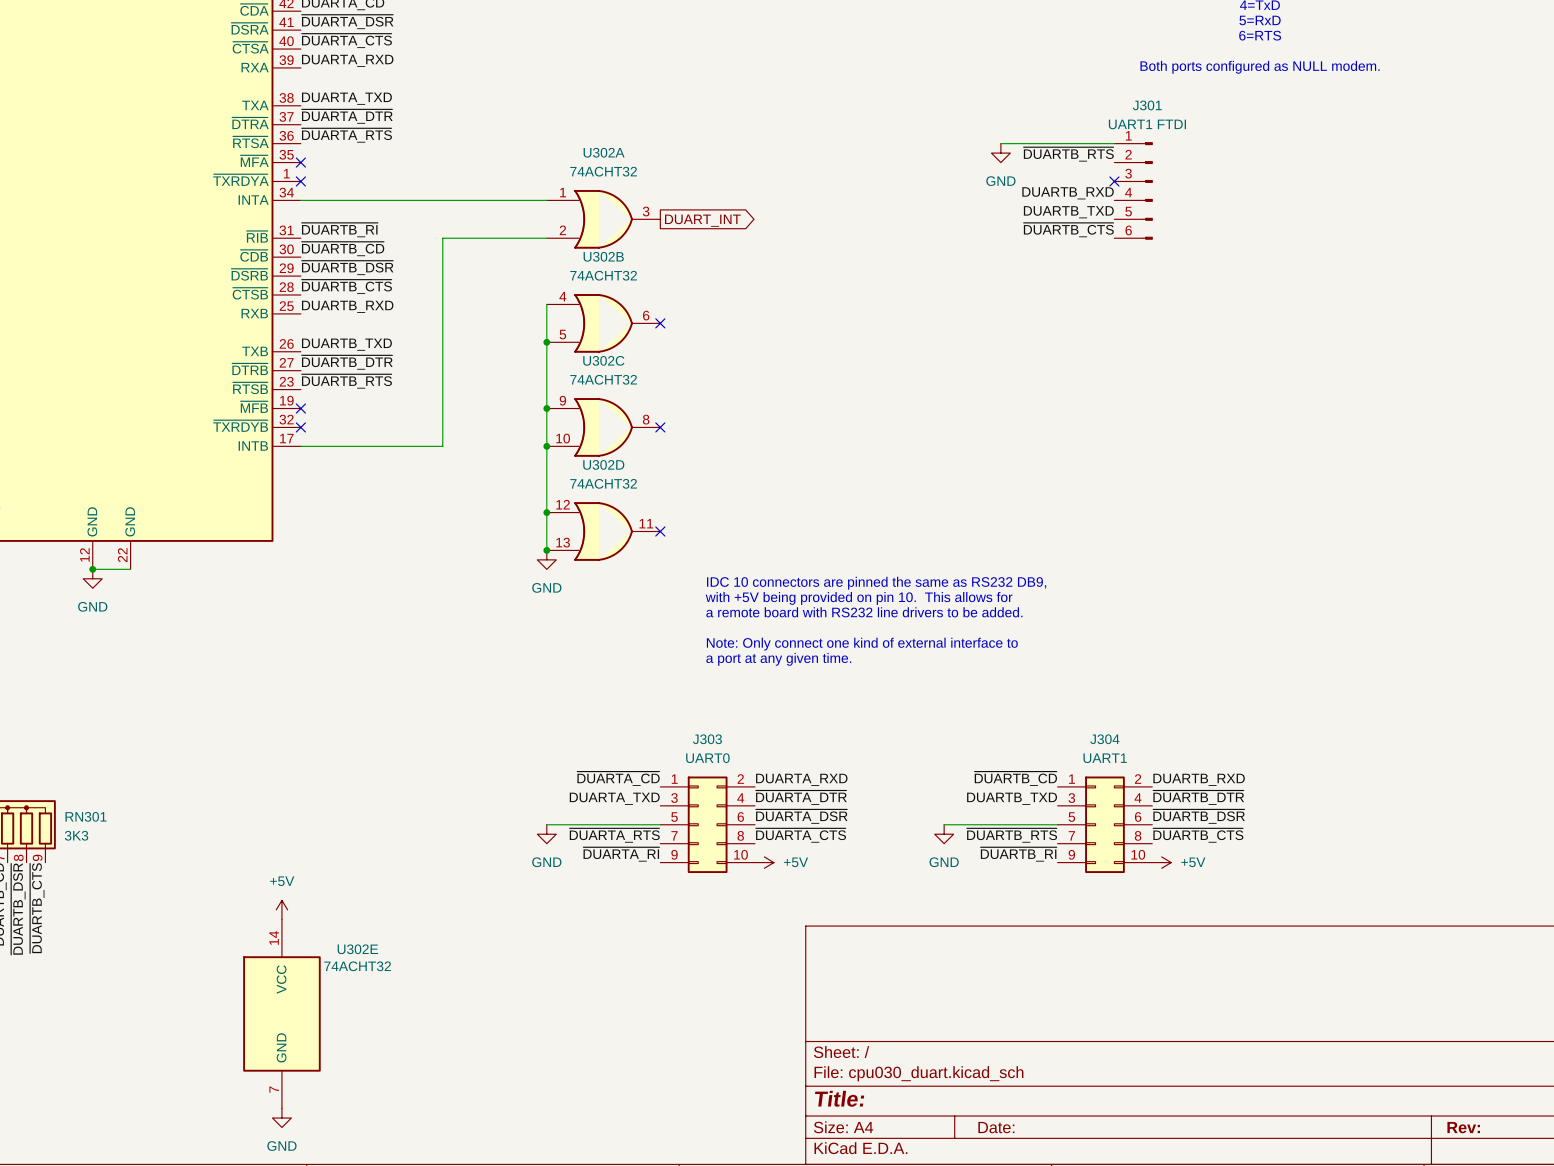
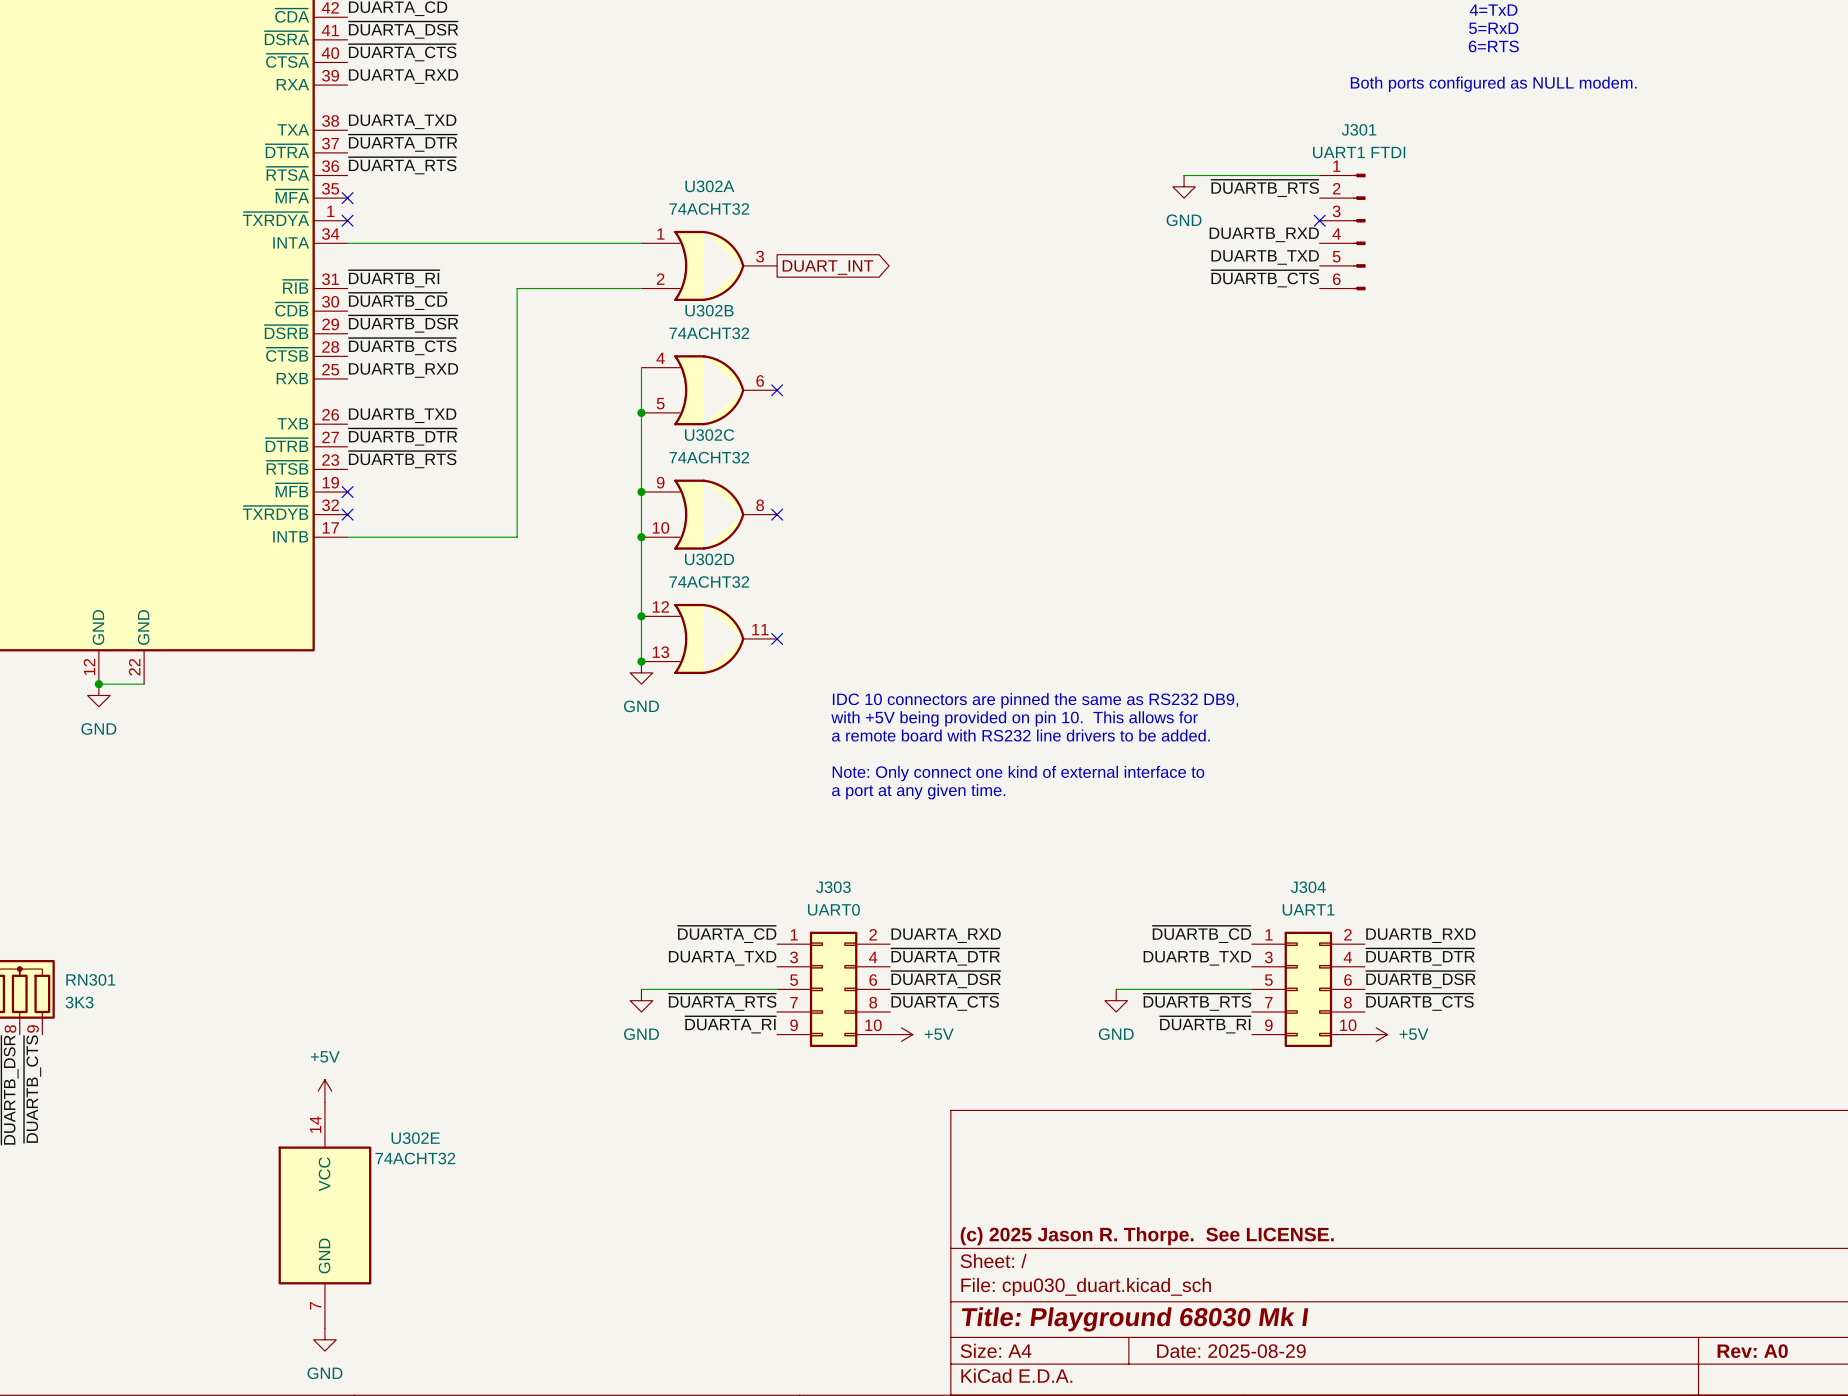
title block: none -> (c) 2025 Jason R. Thorpe. See LICENSE. (1147, 1236)
title block: Title: (839, 1098) -> Title: Playground 68030 Mk I (1135, 1319)
title block: Date: (996, 1127) -> Date: 2025-08-29 (1231, 1351)
title block: Rev: (1463, 1127) -> Rev: A0 (1752, 1351)

